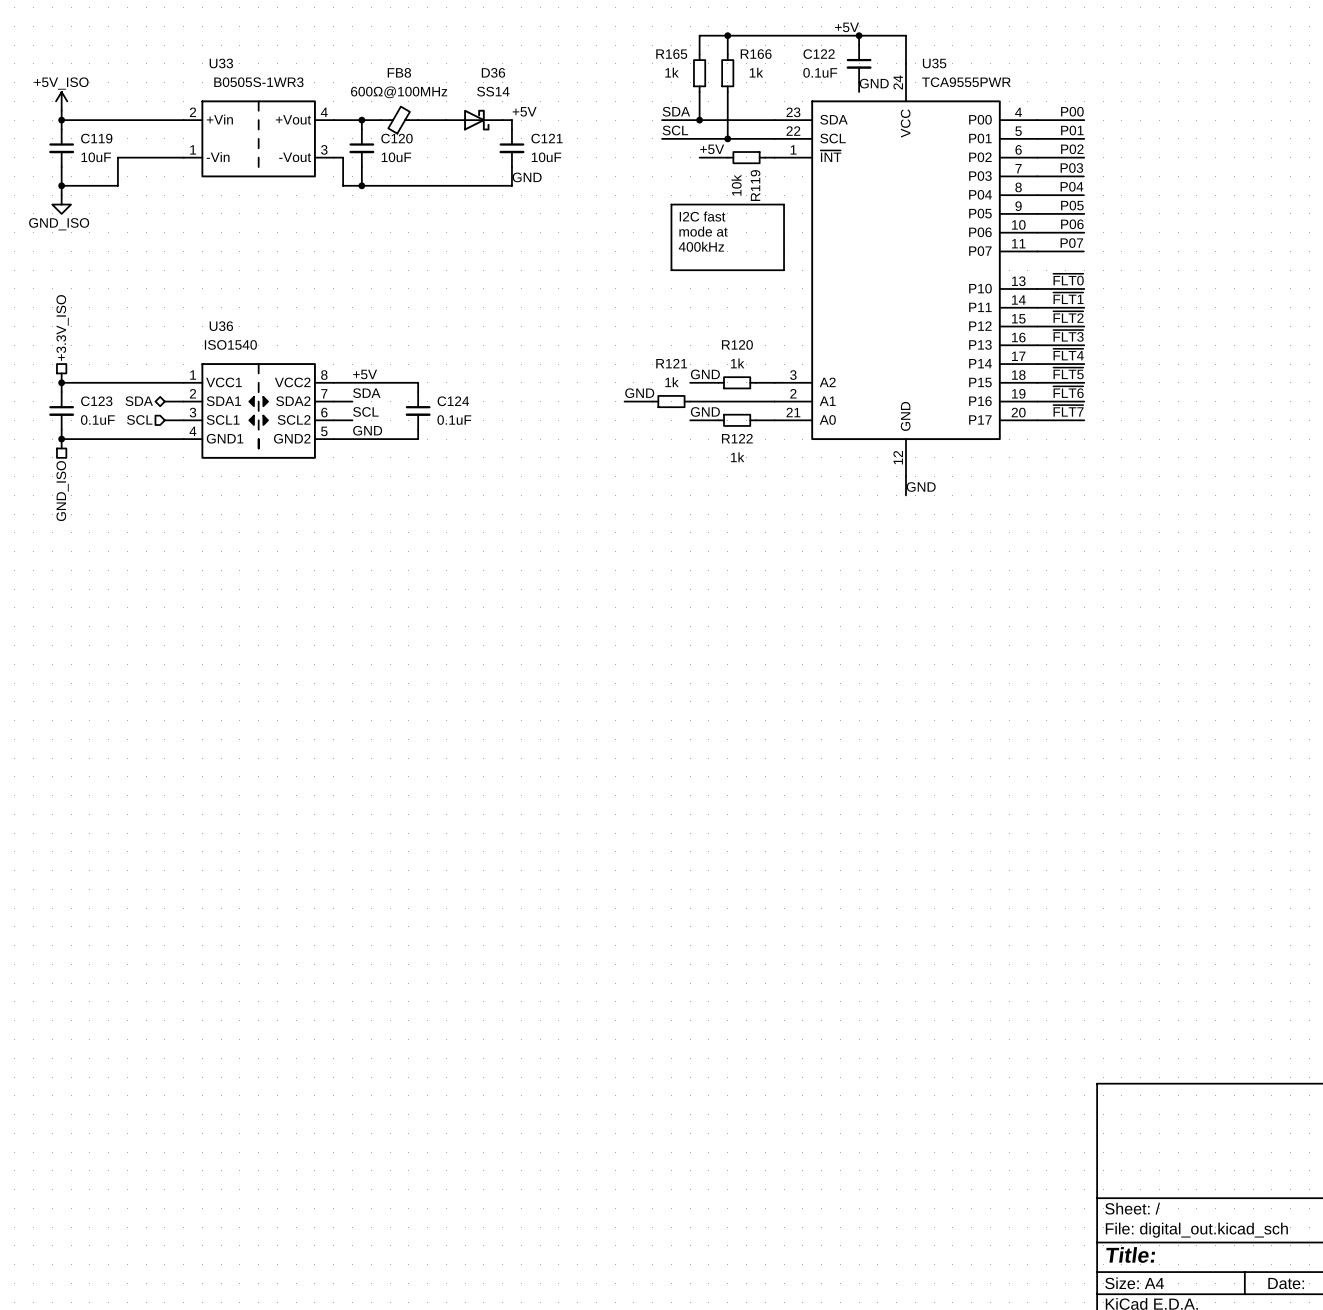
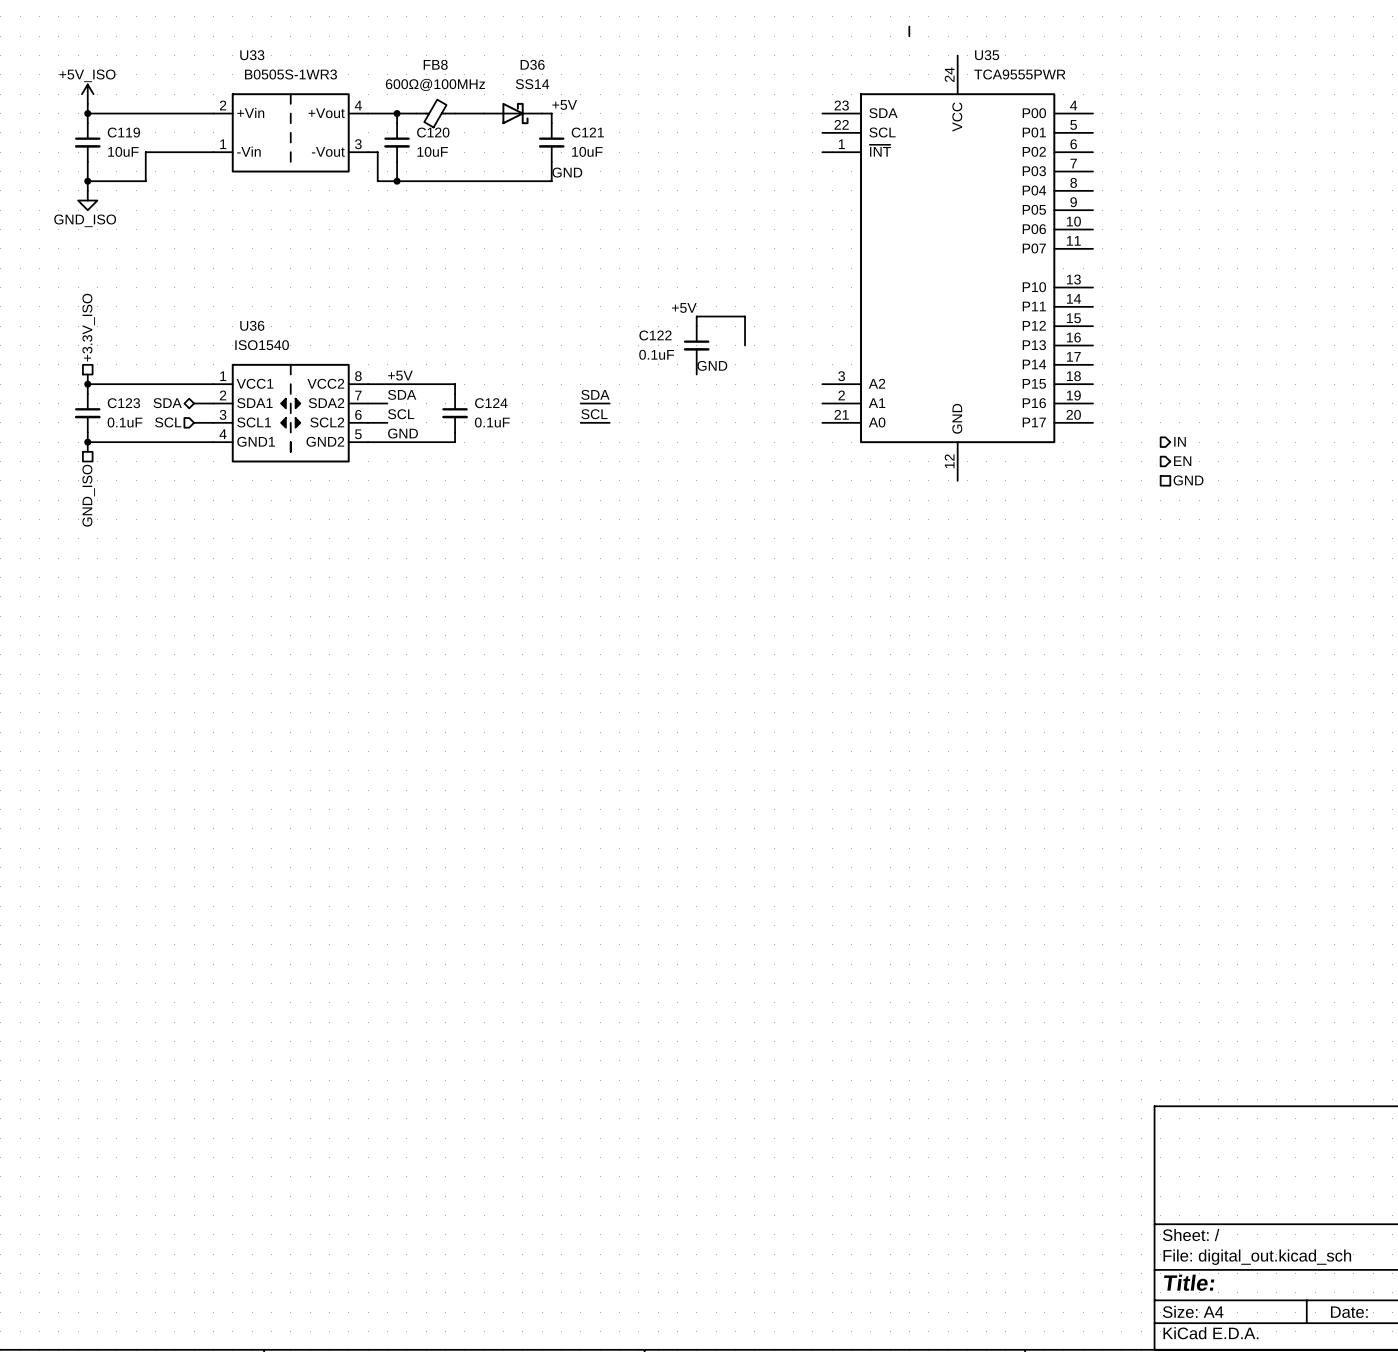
label: +5V (847, 27) -> none
wire: (727, 35) (727, 54) -> none
junction: (727, 35) -> none
junction: (859, 35) -> none
wire: (699, 54) (699, 35) (905, 35) (905, 63) -> none
C122 position: (859, 63) -> (696, 345)
R165: 1k (699, 73) -> none
R166: 1k (727, 73) -> none
wire: (859, 82) (859, 91) -> none
label: GND (874, 83) -> none
wire: (699, 91) (699, 120) -> none
wire: (727, 91) (727, 138) -> none
label: SDA (676, 111) -> none
label: P00 (1072, 111) -> none
wire: (662, 120) (774, 120) -> none
junction: (699, 120) -> none
wire: (1037, 120) (1084, 120) -> none
label: SCL (675, 130) -> none
label: P01 (1072, 130) -> none
wire: (662, 138) (774, 138) -> none
junction: (727, 138) -> none
wire: (1037, 138) (1084, 138) -> none
label position: +5V (712, 149) -> +5V (684, 307)
label: P02 (1072, 149) -> none
wire: (699, 157) (727, 157) -> none
R119: 10k (746, 157) -> none
wire: (765, 157) (774, 157) -> none
wire: (1037, 157) (1084, 157) -> none
label: P03 (1071, 168) -> none
wire: (1037, 176) (1083, 176) -> none
label: P04 (1071, 186) -> none
wire: (1037, 195) (1083, 195) -> none
line: (671, 204) (784, 204) (784, 270) (671, 270) (671, 204) -> none
label: P05 (1072, 205) -> none
wire: (1037, 213) (1084, 213) -> none
text: I2C fast (702, 216) -> none
label: P06 (1072, 224) -> none
text: mode at (703, 231) -> none
wire: (1037, 232) (1084, 232) -> none
label: P07 (1071, 243) -> none
text: 400kHz (701, 246) -> none
wire: (1037, 251) (1083, 251) -> none
label: ~{FLT0} (1068, 279) -> none
wire: (1037, 288) (1084, 288) -> none
label: ~{FLT1} (1068, 298) -> none
wire: (1037, 307) (1084, 307) -> none
label: ~{FLT2} (1068, 317) -> none
wire: none -> (696, 326) (696, 316) (745, 316) (745, 345)
wire: (1037, 326) (1084, 326) -> none
label: ~{FLT3} (1068, 335) -> none
wire: (1037, 345) (1084, 345) -> none
label: ~{FLT4} (1068, 354) -> none
wire: none -> (696, 364) (696, 374)
wire: (1037, 364) (1084, 364) -> none
label: none -> GND (712, 365)
label: ~{FLT5} (1068, 373) -> none
label: GND (705, 374) -> none
wire: (690, 382) (718, 382) -> none
R120: 1k (737, 382) -> none
wire: (755, 382) (774, 382) -> none
wire: (1037, 382) (1084, 382) -> none
label: ~{FLT6} (1068, 392) -> none
label: none -> SDA (595, 394)
label: GND (639, 393) -> none
wire: (624, 401) (652, 401) -> (580, 403) (609, 403)
R121: 1k (671, 401) -> none
wire: (690, 401) (774, 401) -> none
wire: (1037, 401) (1084, 401) -> none
label: ~{FLT7} (1068, 410) -> none
label: none -> SCL (594, 414)
label: GND (705, 411) -> none
wire: (690, 420) (718, 420) -> (580, 422) (609, 422)
R122: 1k (737, 420) -> none
wire: (755, 420) (774, 420) -> none
wire: (1037, 420) (1084, 420) -> none
sheet pin: none -> IN (1180, 441)
sheet pin: none -> EN (1182, 461)
wire: (905, 476) (905, 495) -> none
sheet pin: none -> GND (1188, 480)
label: GND (921, 487) -> none

